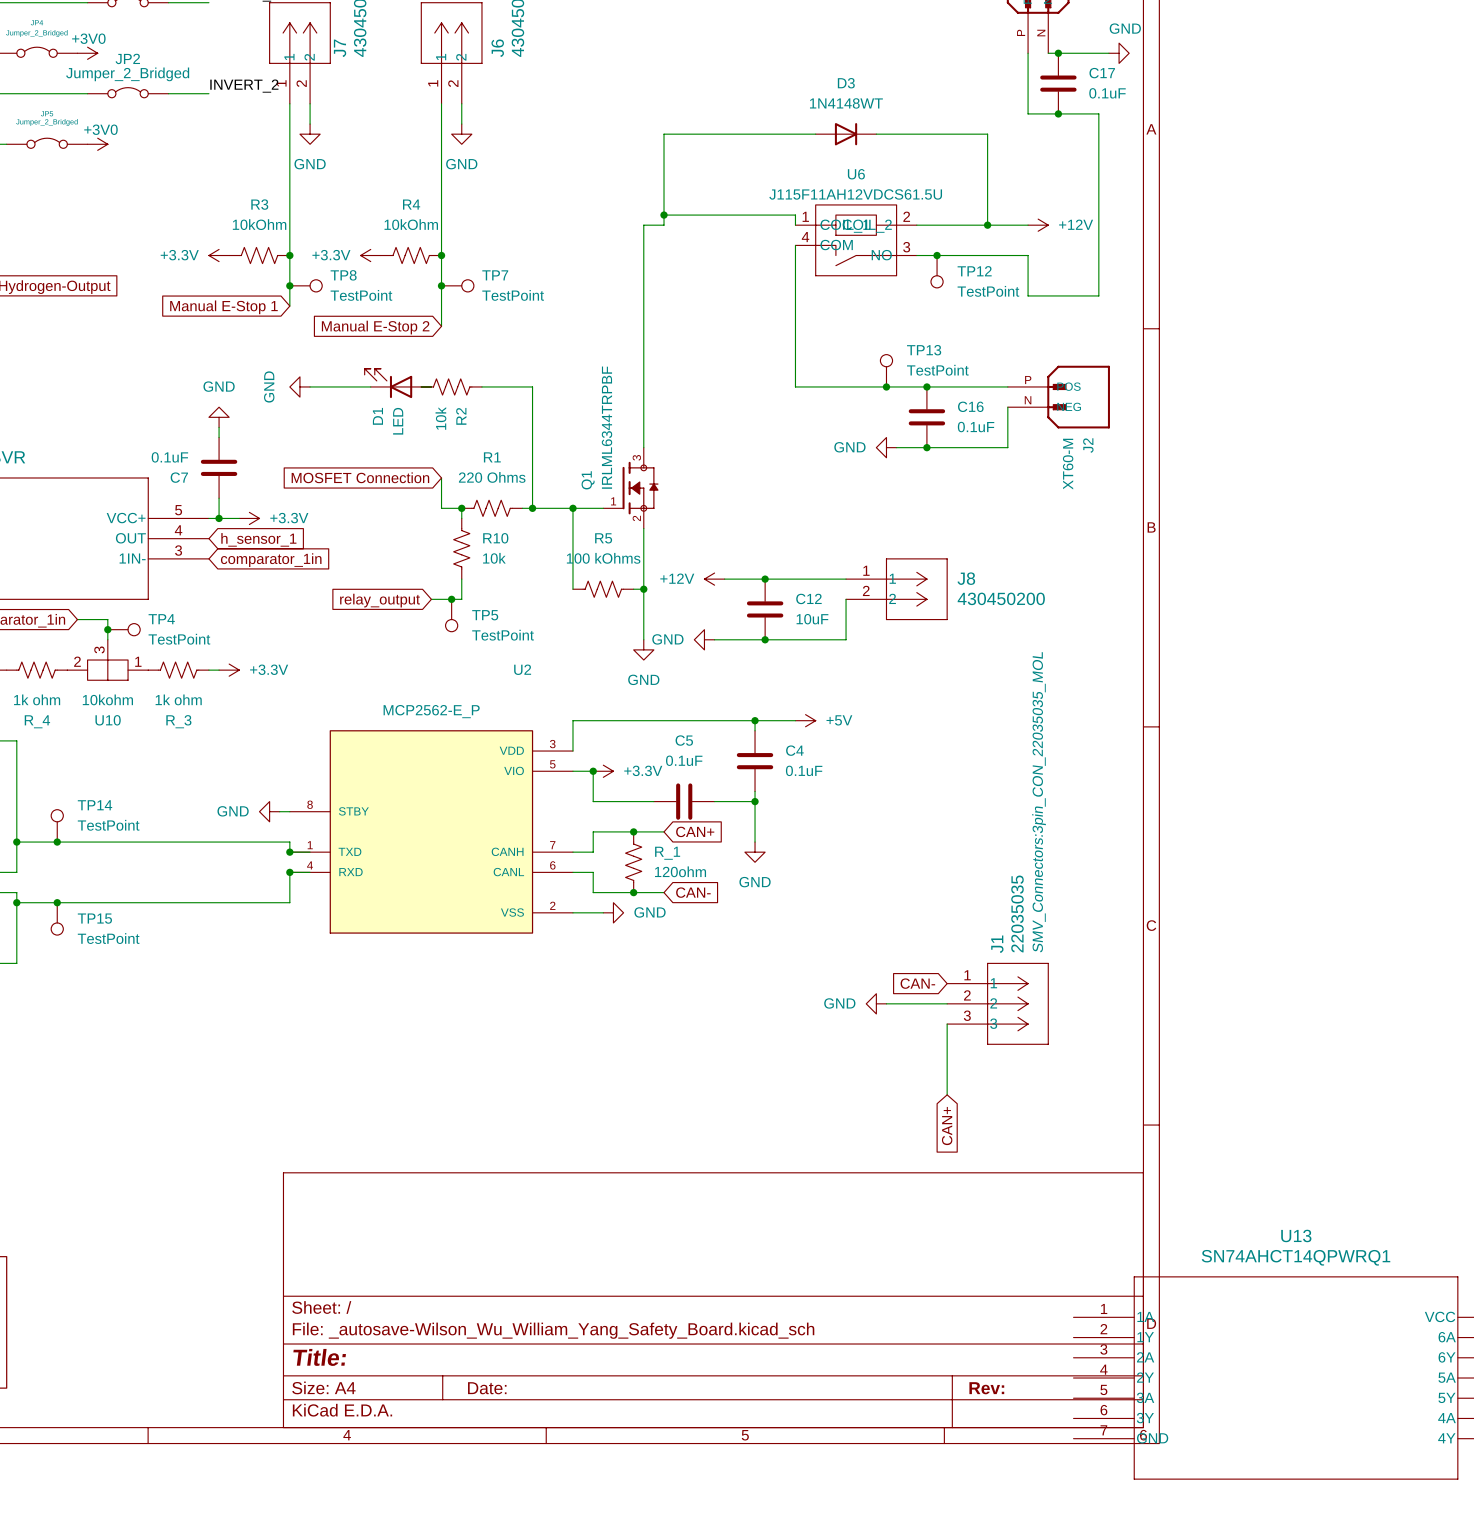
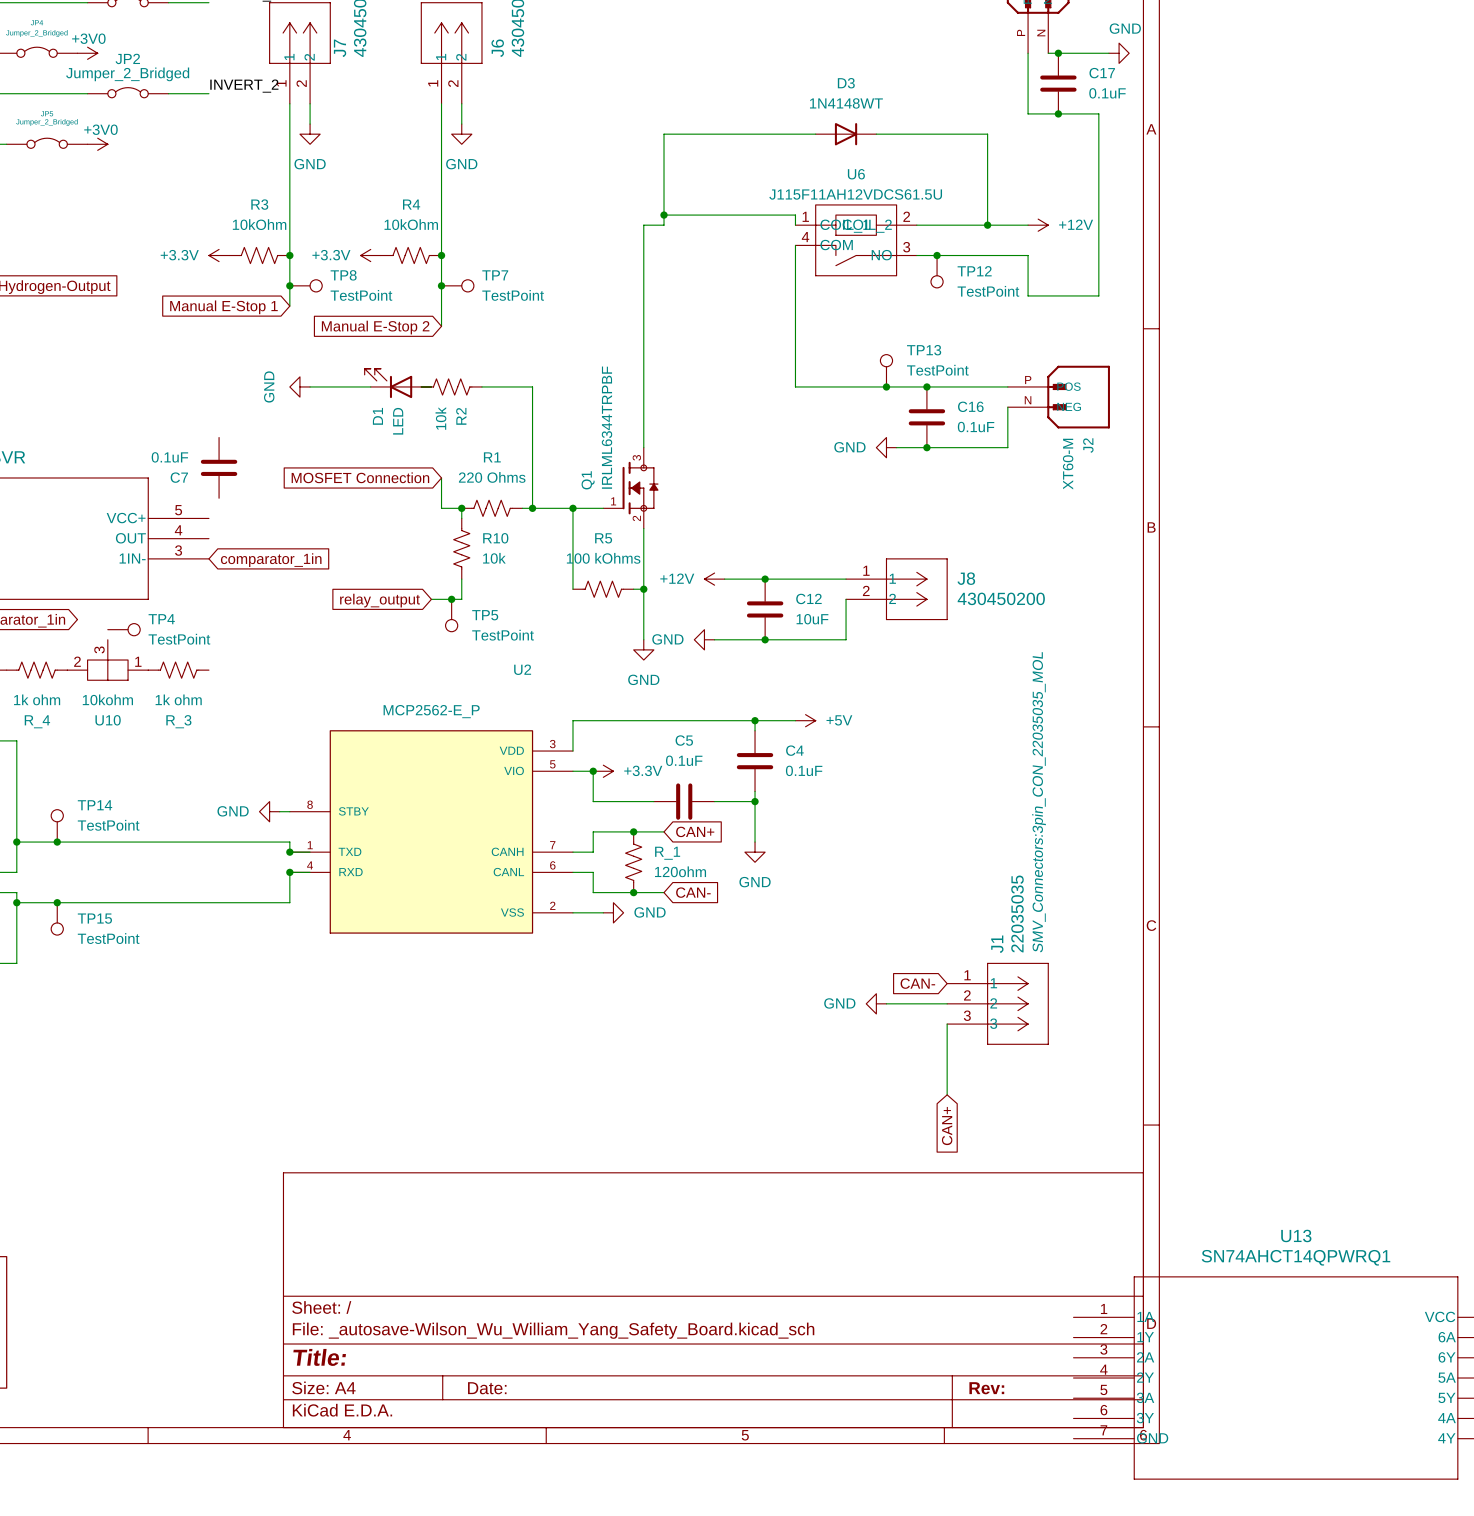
power symbol: GND (219, 417) -> none
wire: (219, 427) (219, 437) -> none
wire: (219, 498) (219, 518) -> none
wire: (208, 518) (239, 518) -> none
junction: (219, 518) -> none
power symbol: +3.3V (249, 518) -> none
global label: h_sensor_1 (258, 539) -> none
wire: (77, 619) (107, 619) (107, 639) -> none
junction: (107, 629) -> none
wire: (208, 670) (219, 670) -> none
power symbol: +3.3V (229, 670) -> none

